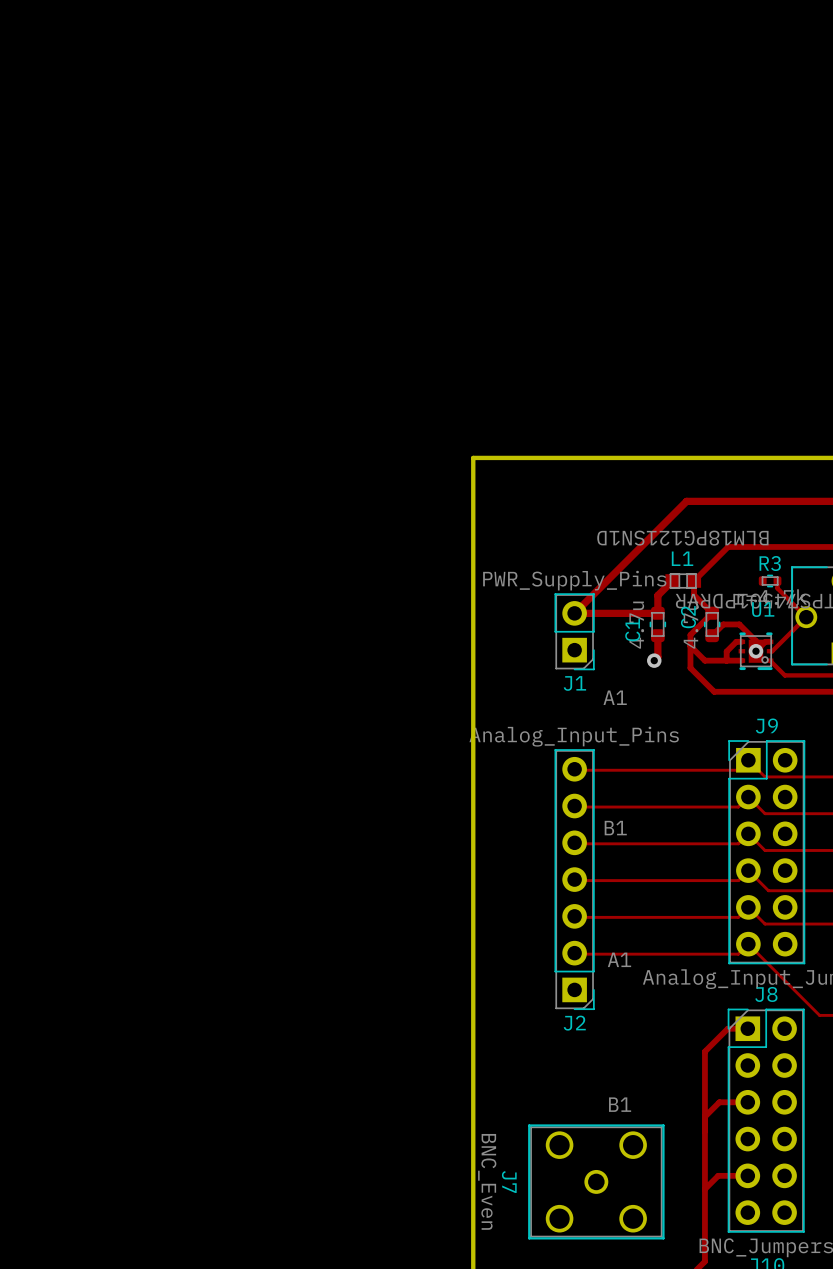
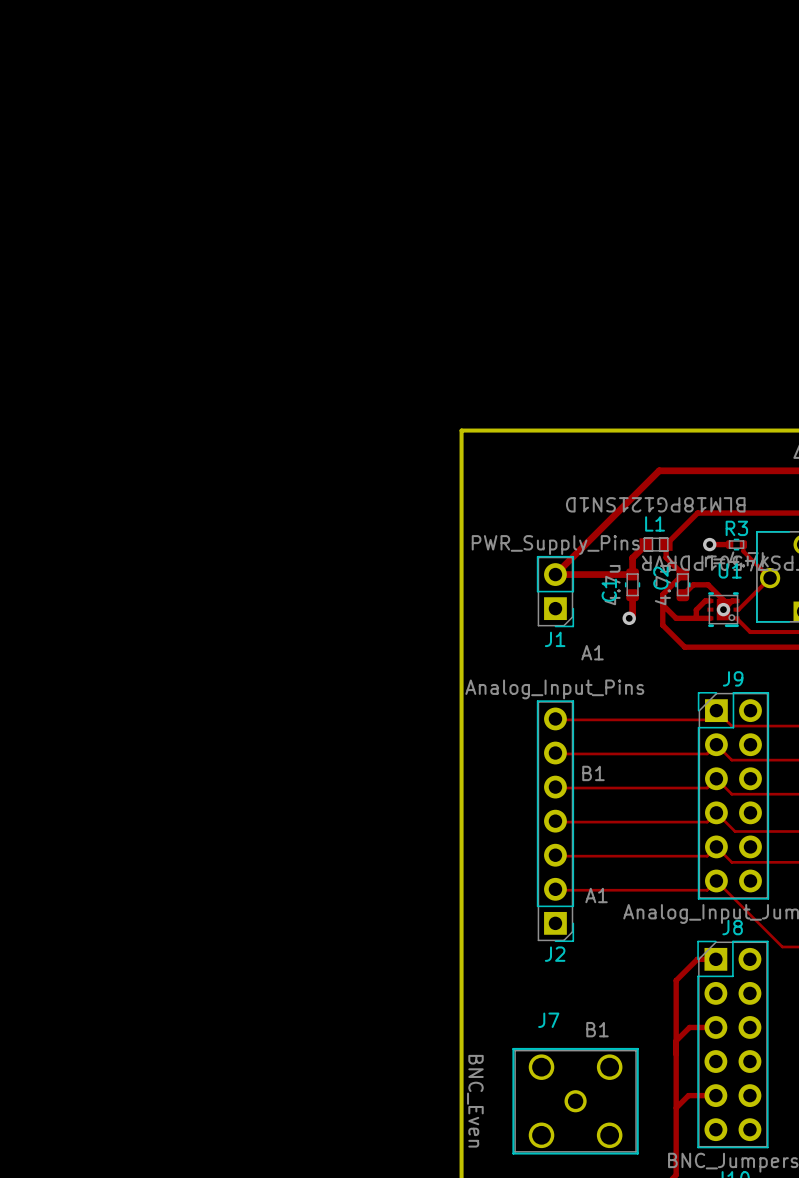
track: none -> (709, 544) (729, 544)
via: none -> (709, 544)
J7 name rotation: 0° (509, 1181) -> 90° counterclockwise (548, 1020)
J7 name position: J7 (509, 1181) -> J7 (548, 1020)

